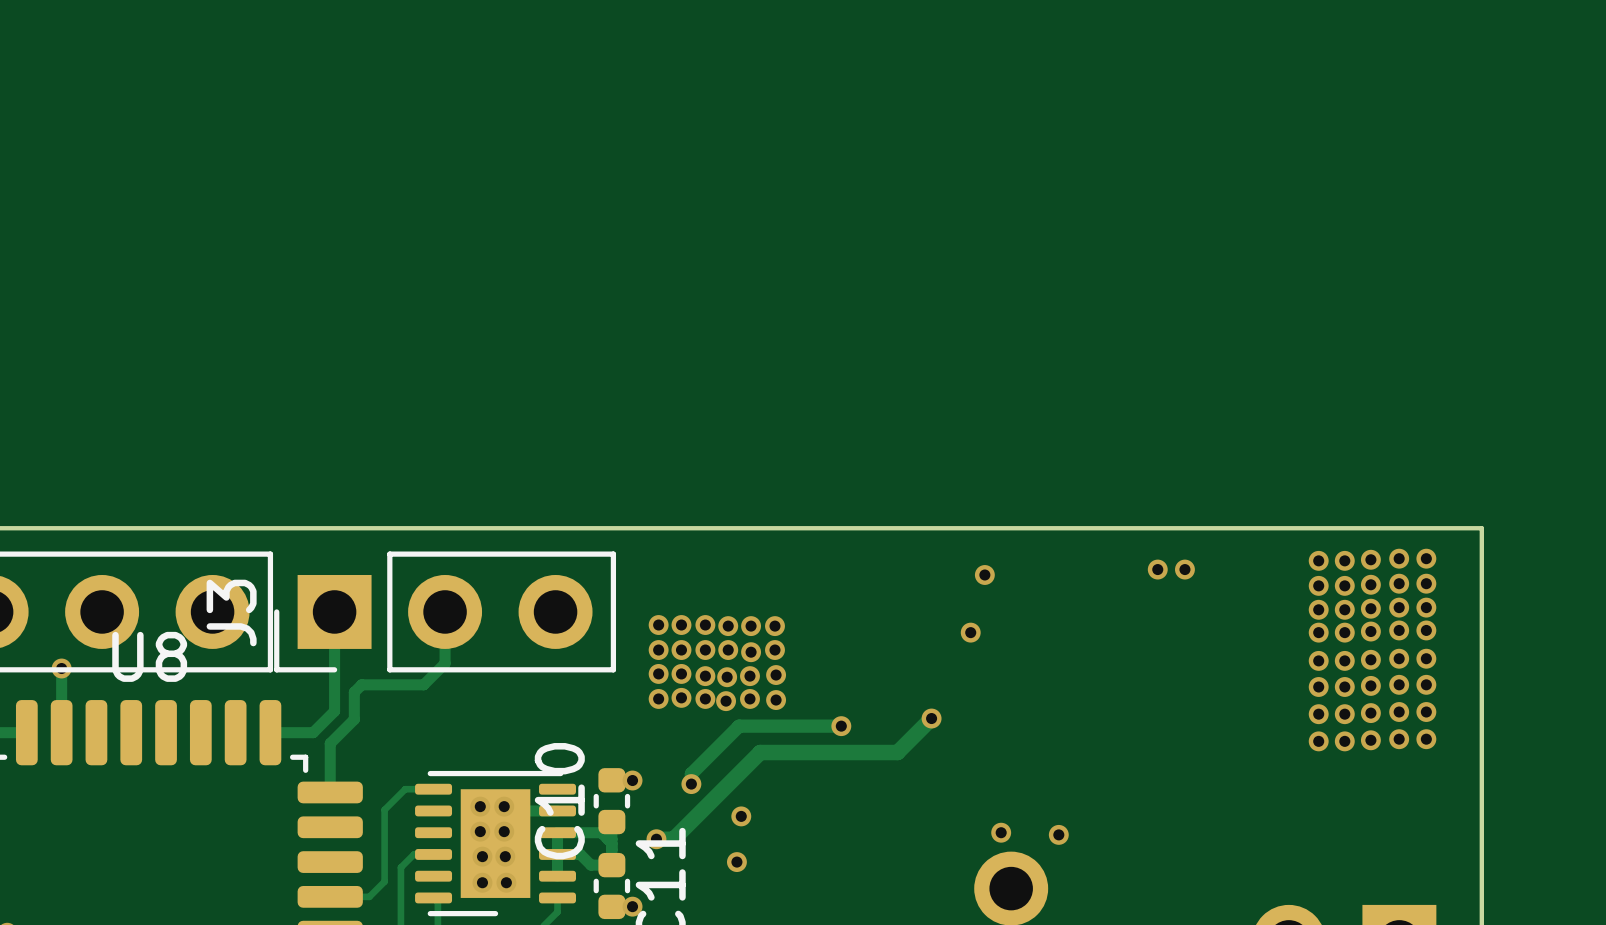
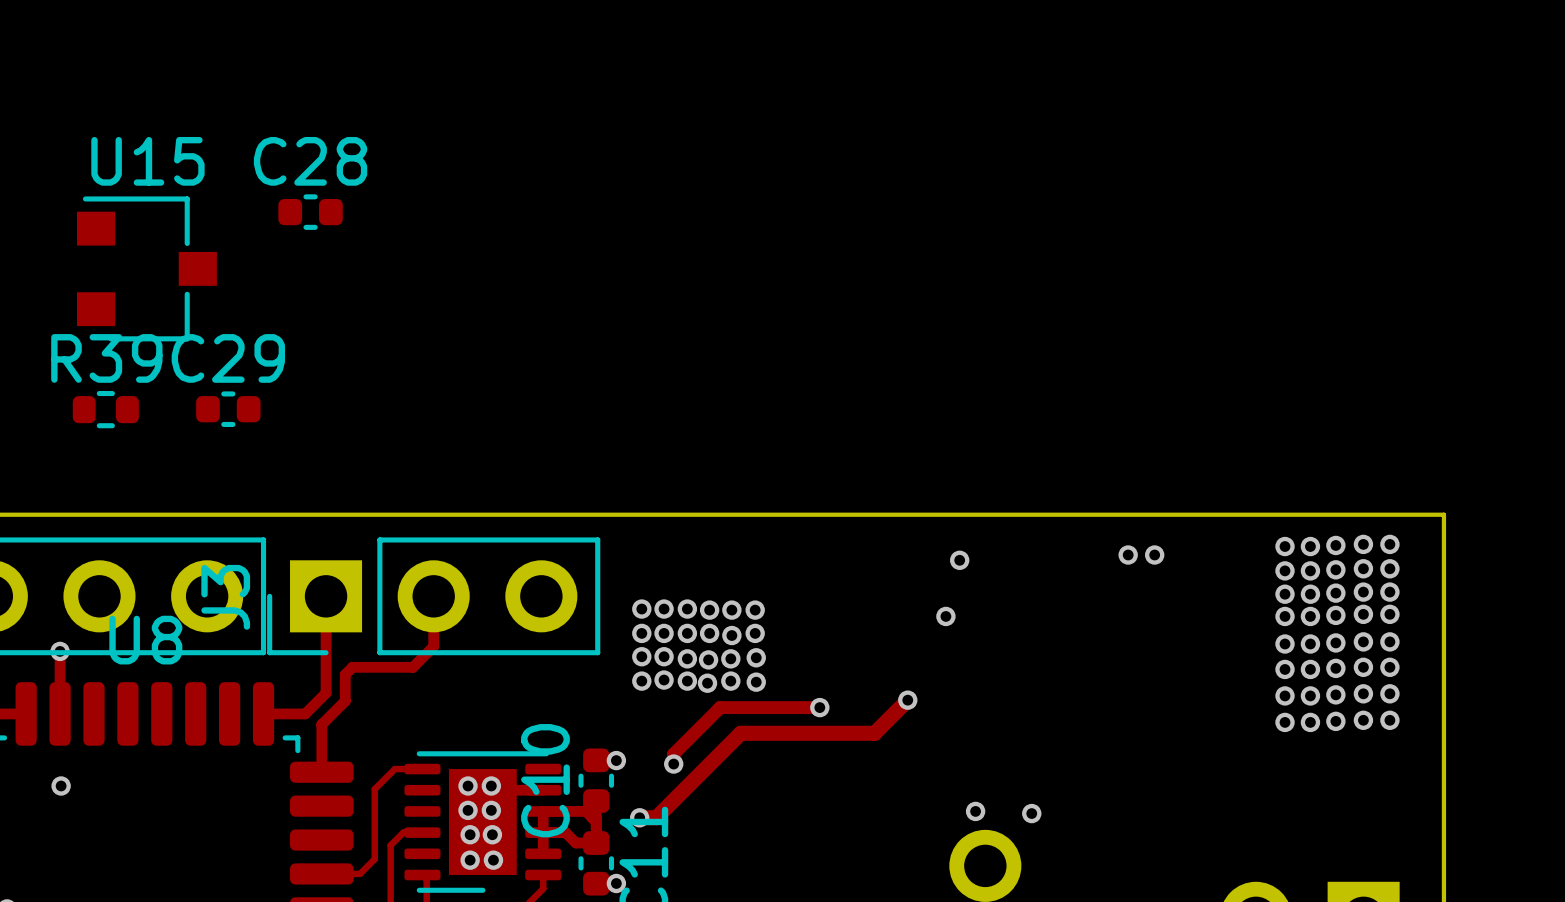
C28: none -> (310, 212)
U15: none -> (146, 268)
C29: none -> (228, 409)
R39: none -> (105, 409)
via: none -> (61, 786)
via: (741, 816) -> none
via: (736, 862) -> none

